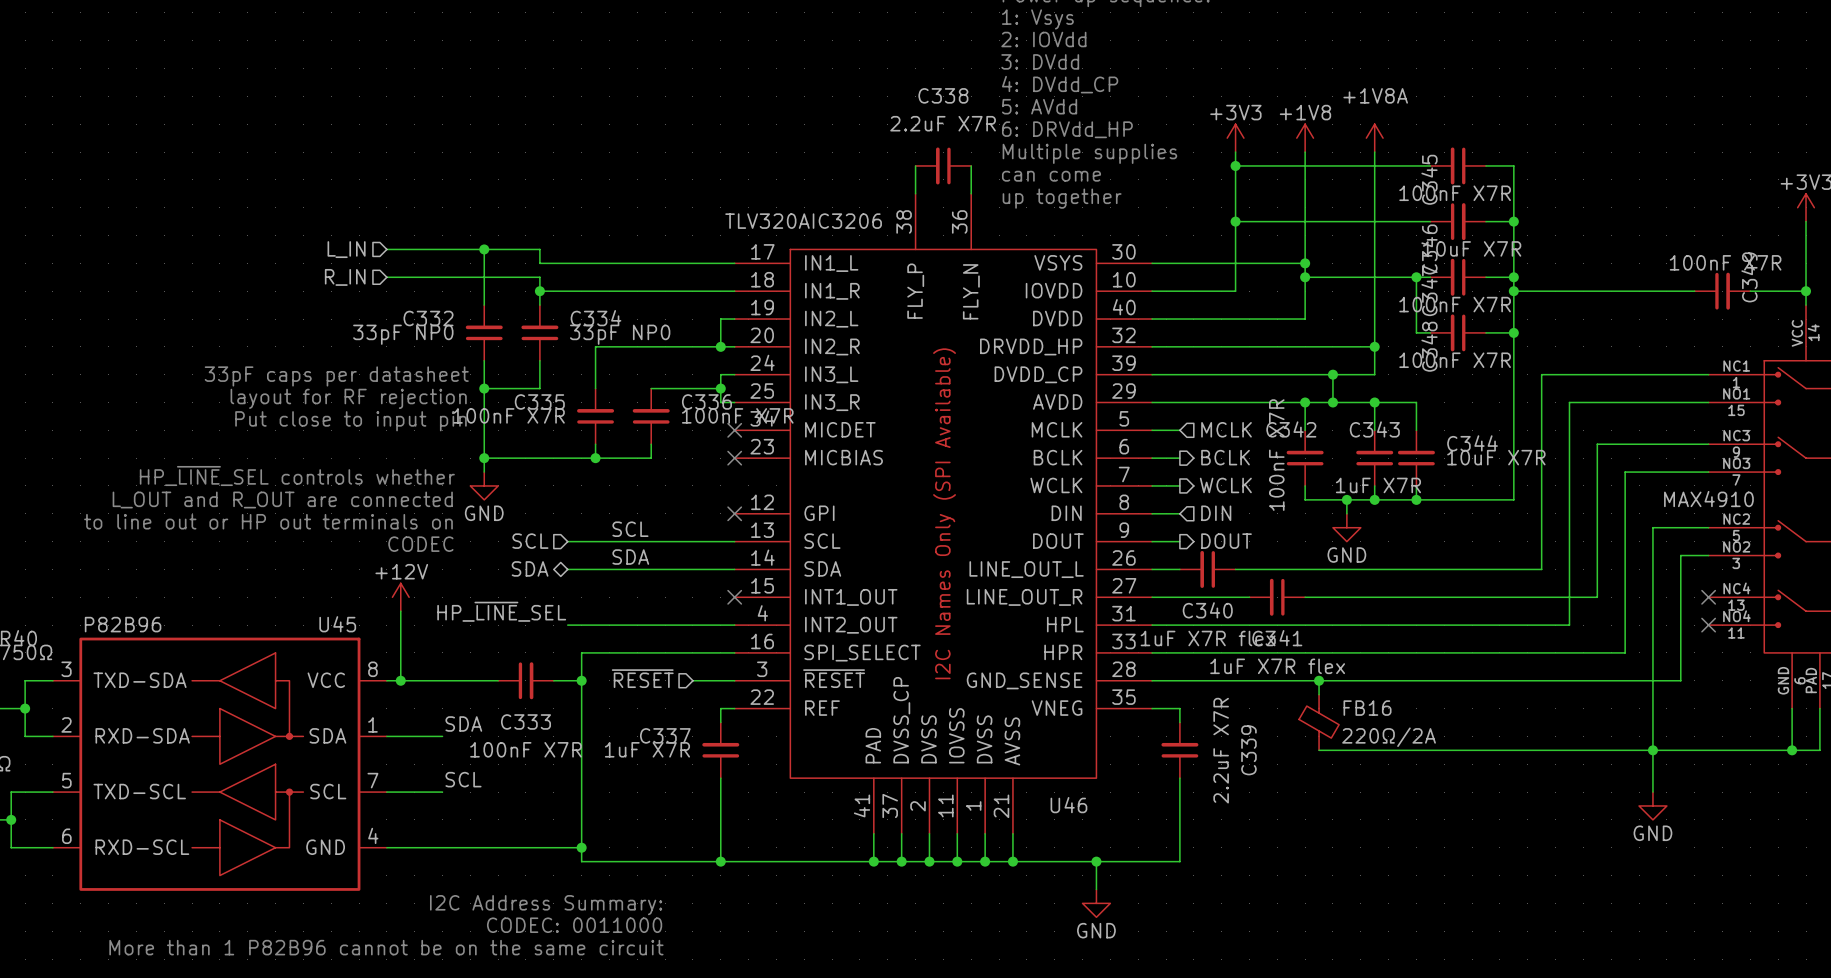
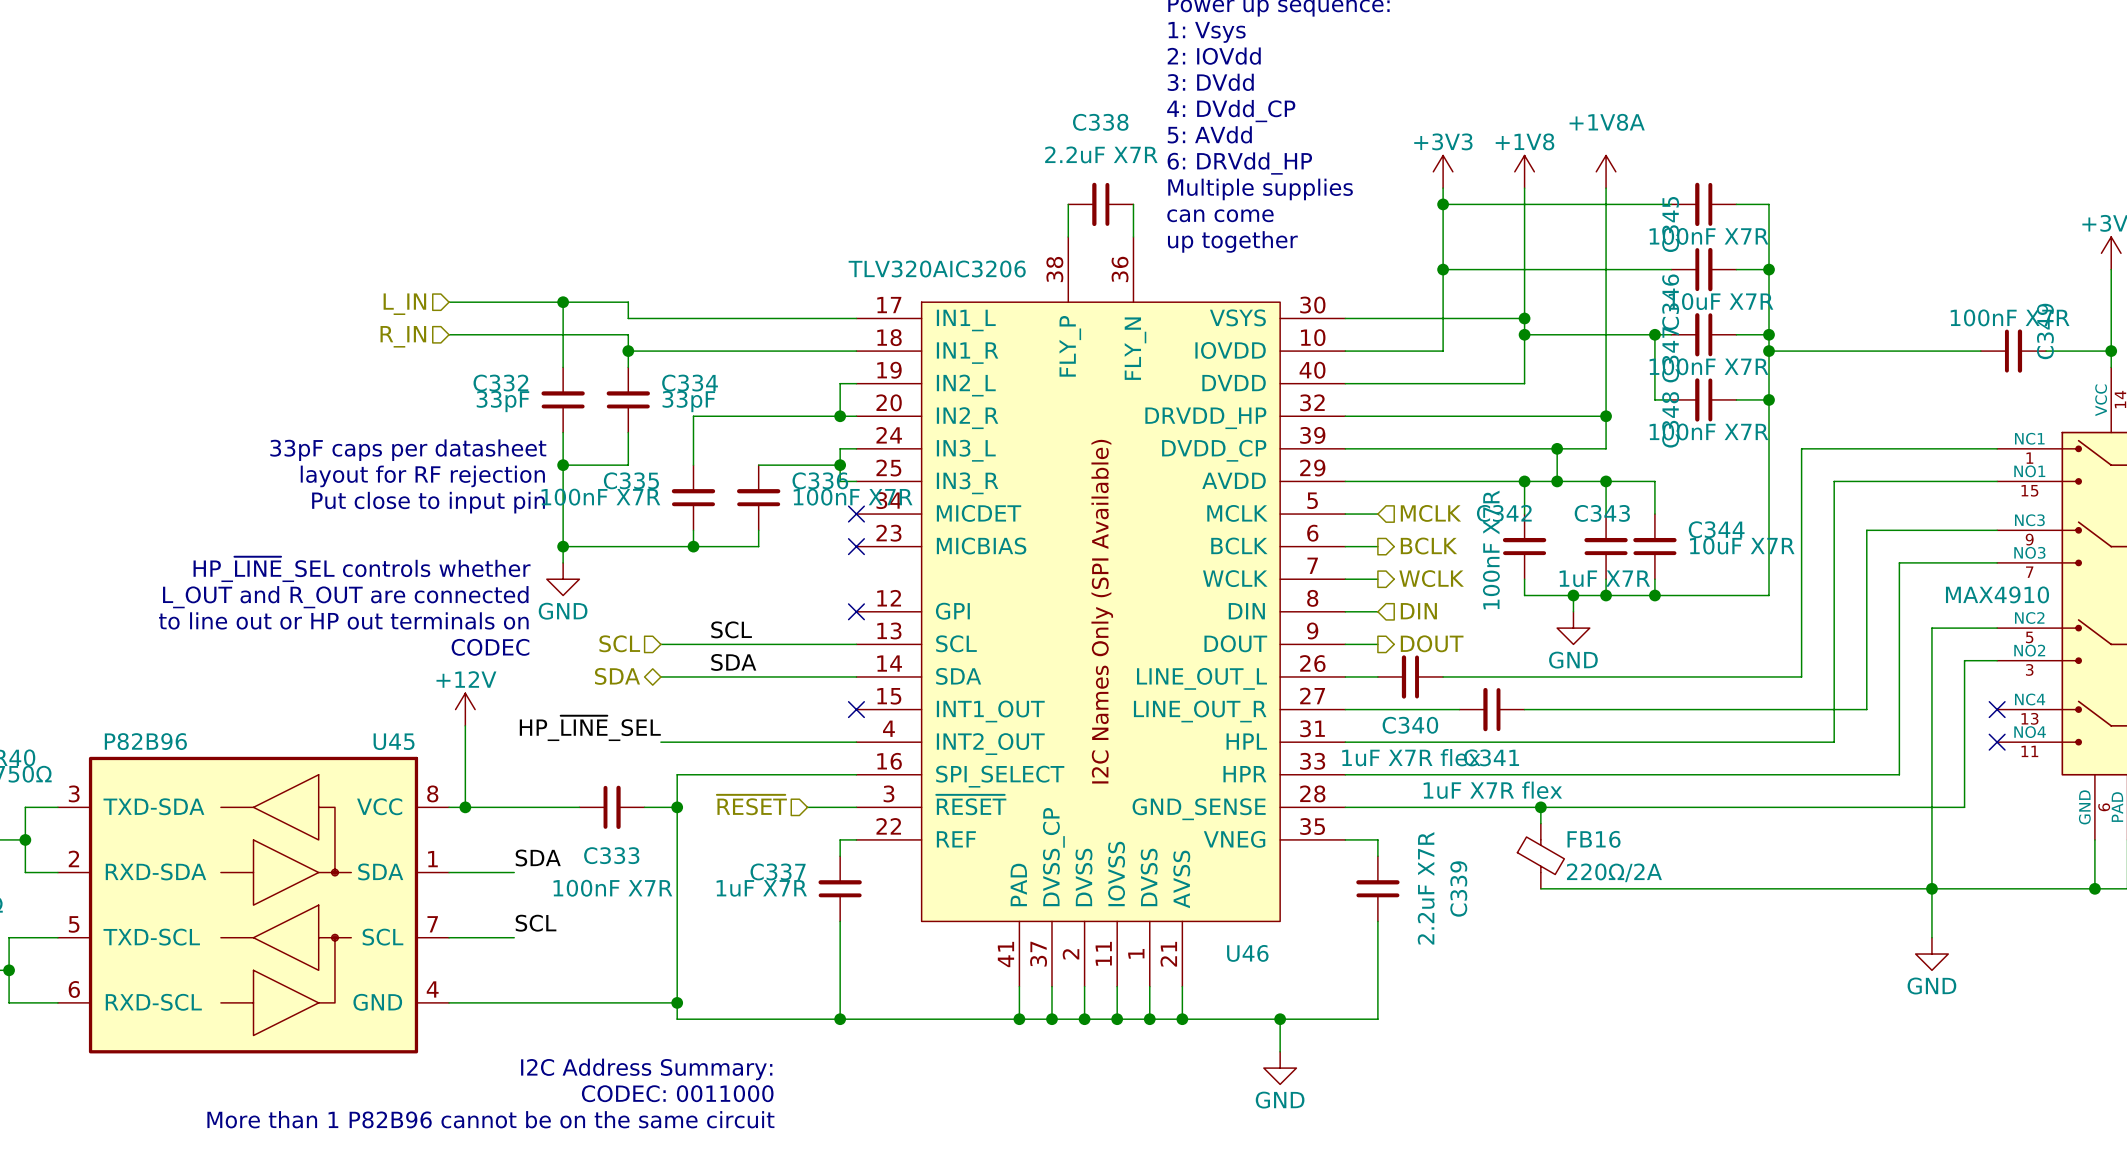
C332 value: 33pF NP0 (403, 334) -> 33pF (502, 401)
C334 value: 33pF NP0 (620, 334) -> 33pF (688, 401)

